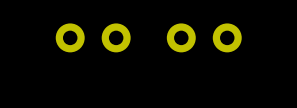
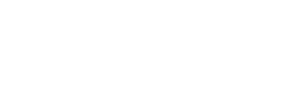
part: (93, 37) -> none
part: (204, 37) -> none

